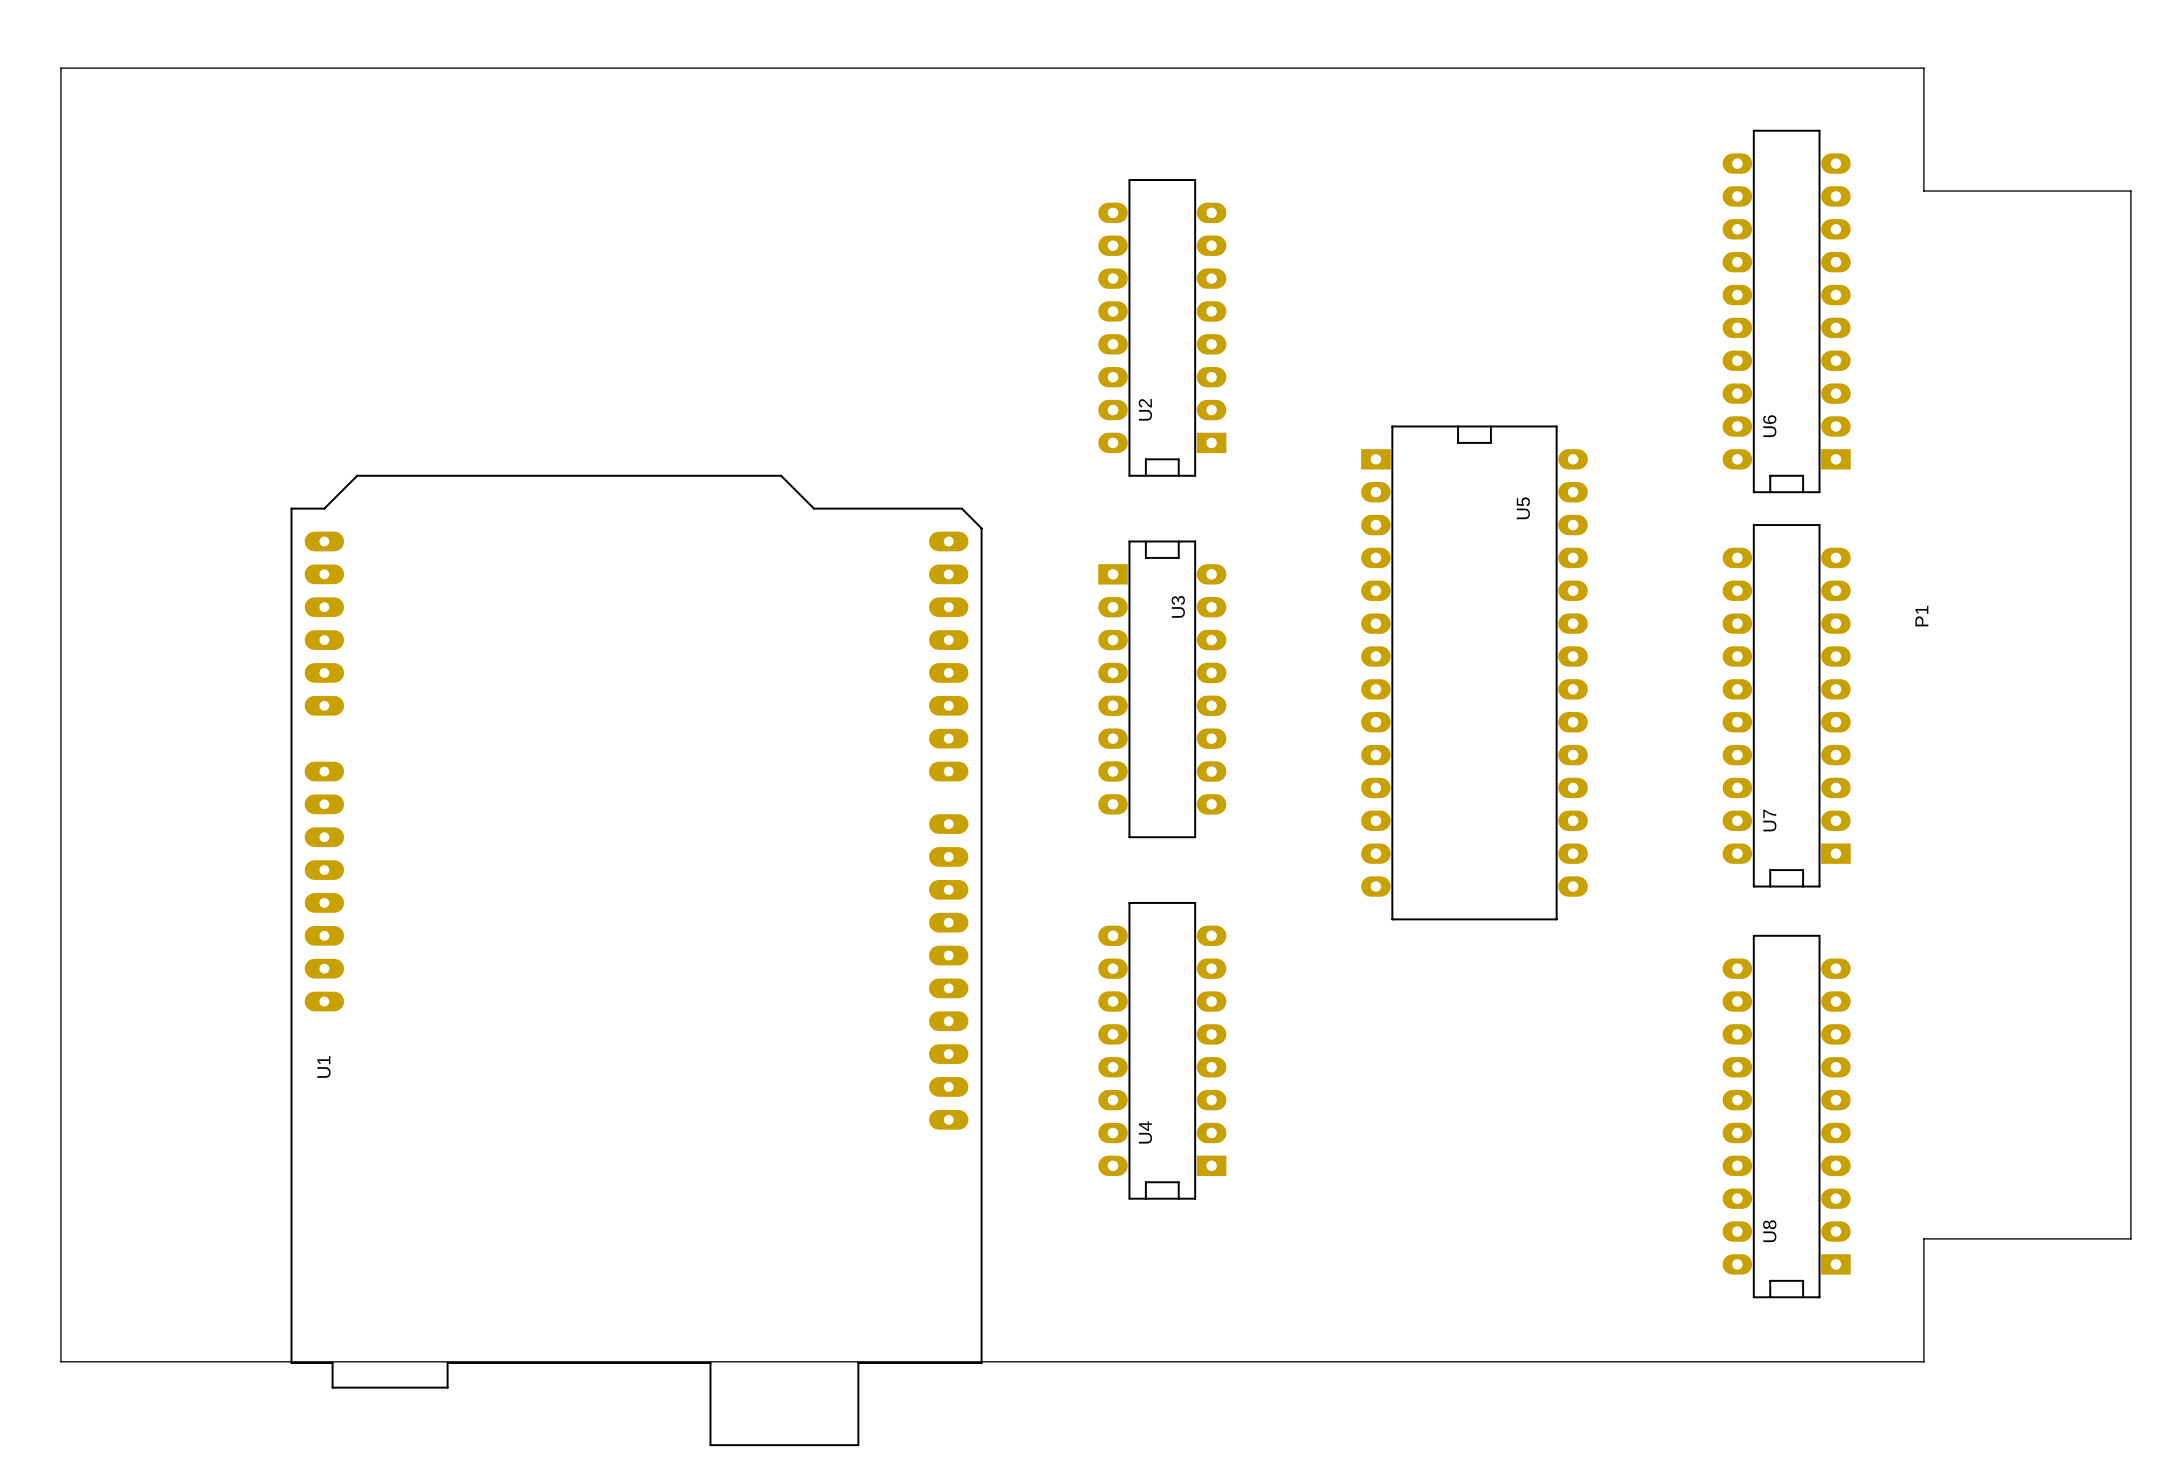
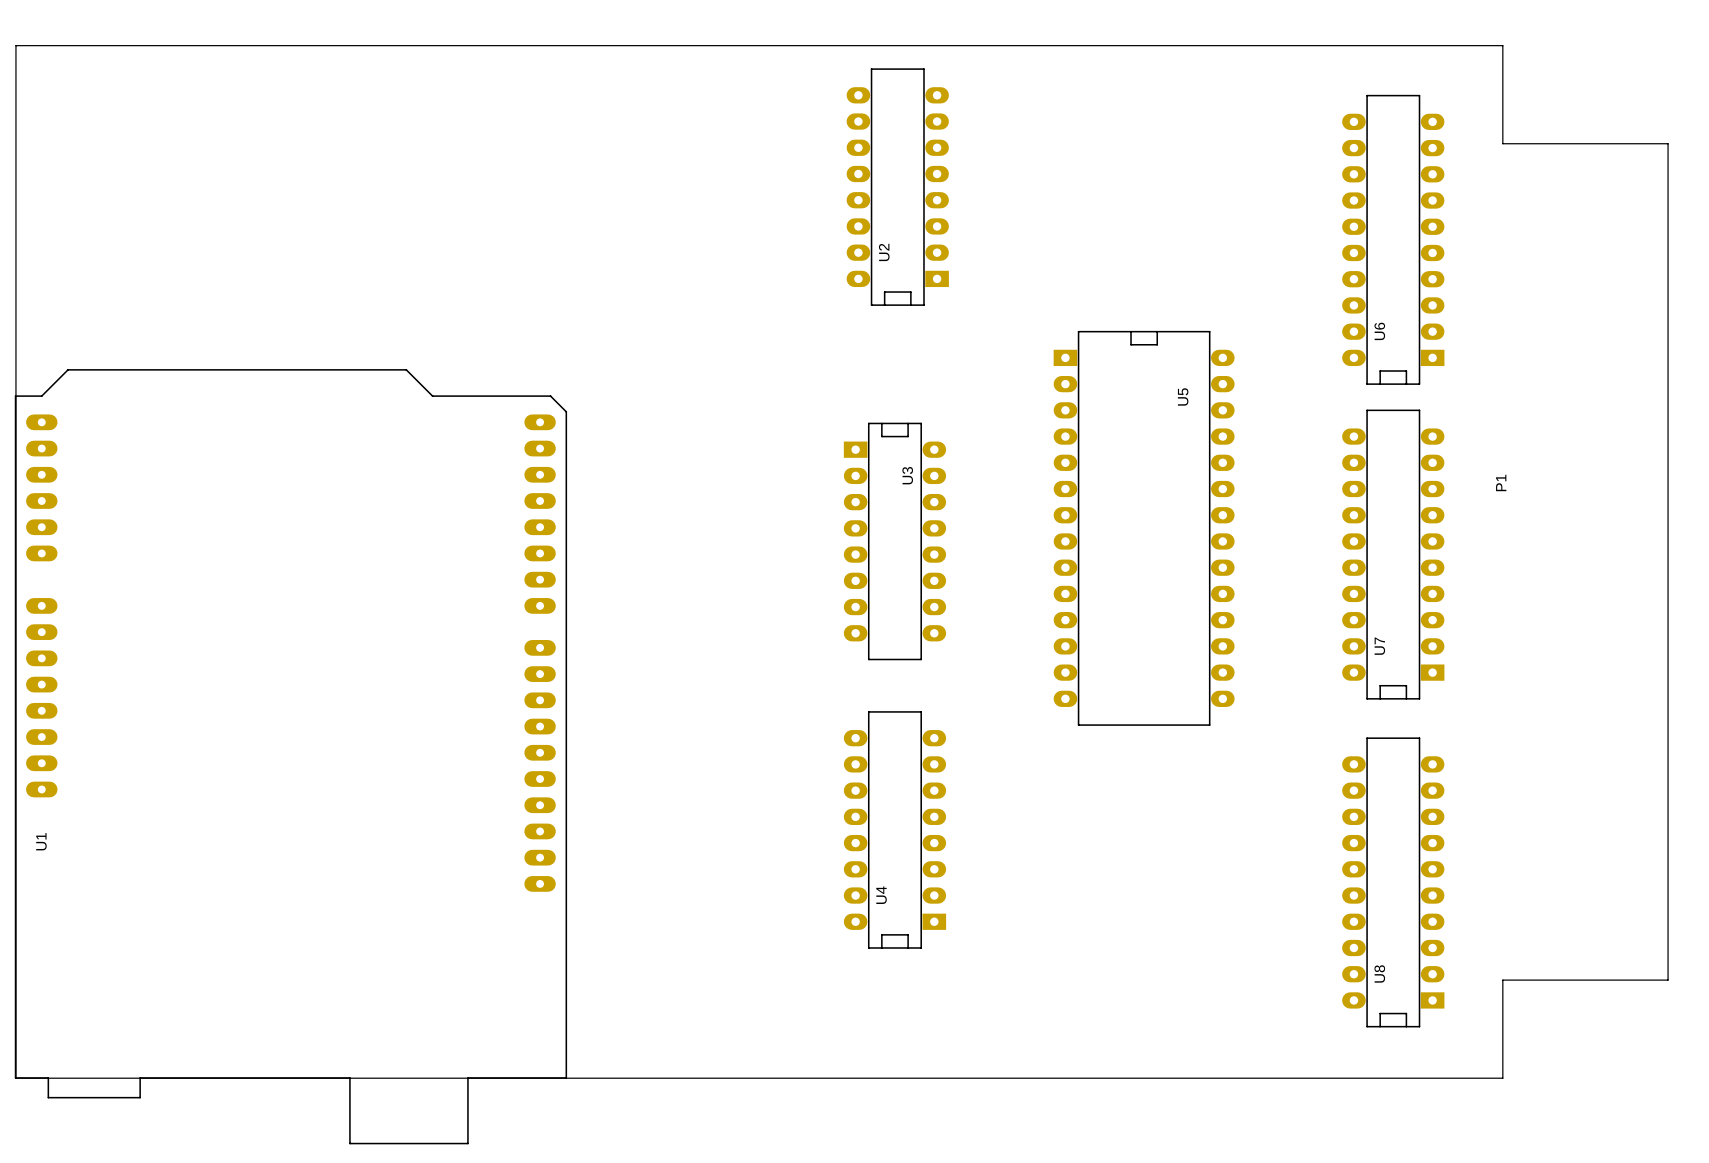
U2 position: (1162, 327) -> (897, 187)
U1 position: (636, 960) -> (290, 756)

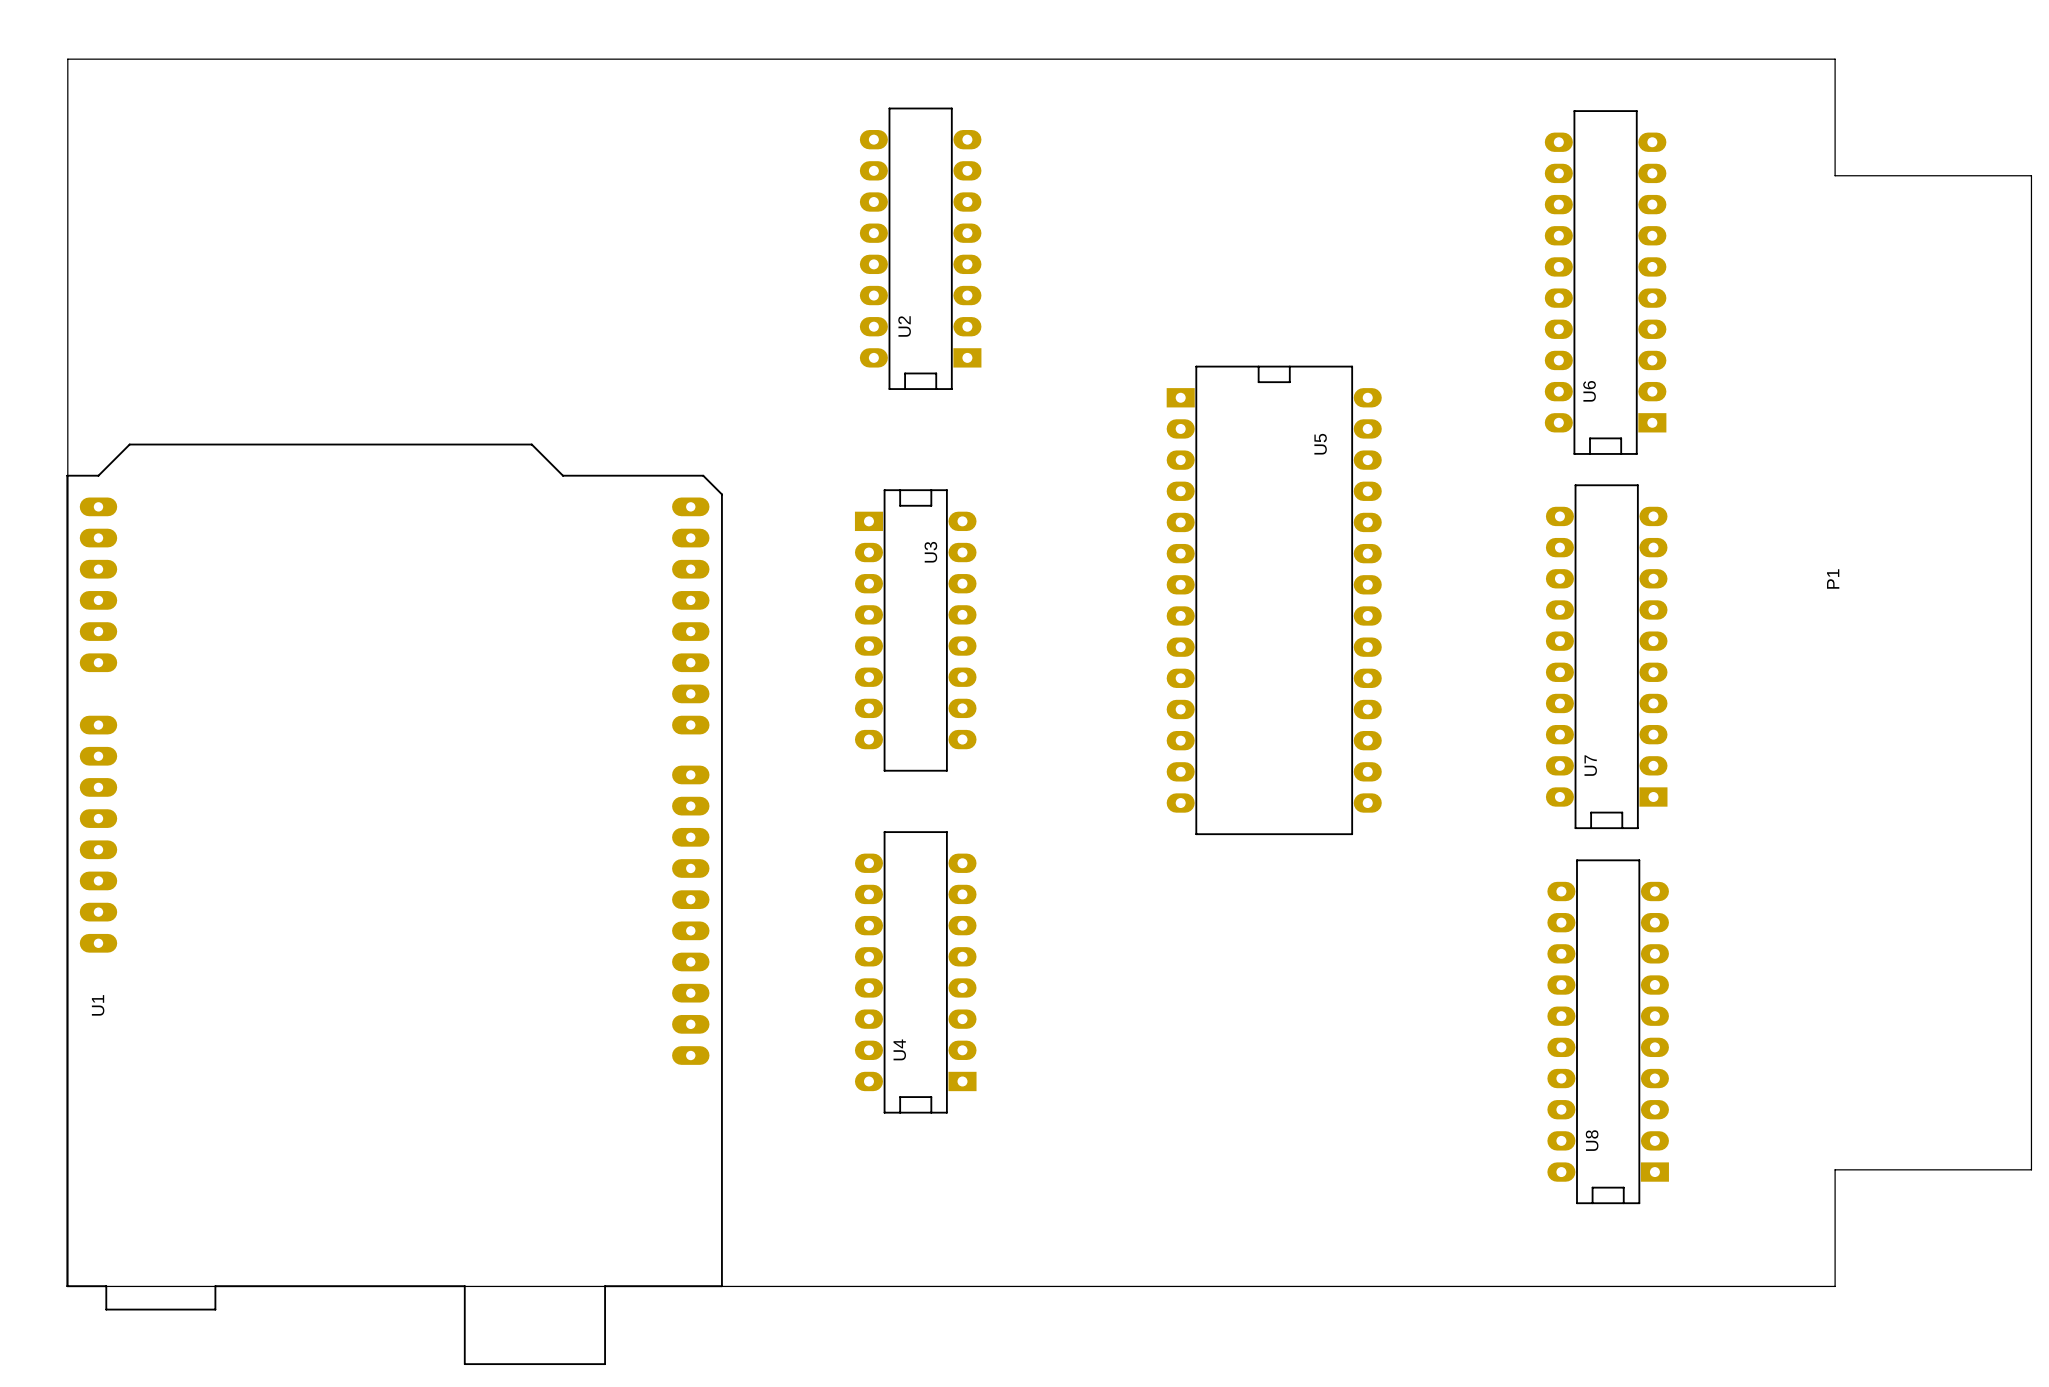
U2 position: (897, 187) -> (920, 248)
U6 position: (1393, 239) -> (1605, 282)
U5 position: (1144, 528) -> (1274, 600)
U3 position: (894, 541) -> (915, 630)
U7 position: (1393, 554) -> (1606, 656)
U4 position: (894, 829) -> (915, 972)
U8 position: (1393, 882) -> (1608, 1031)

